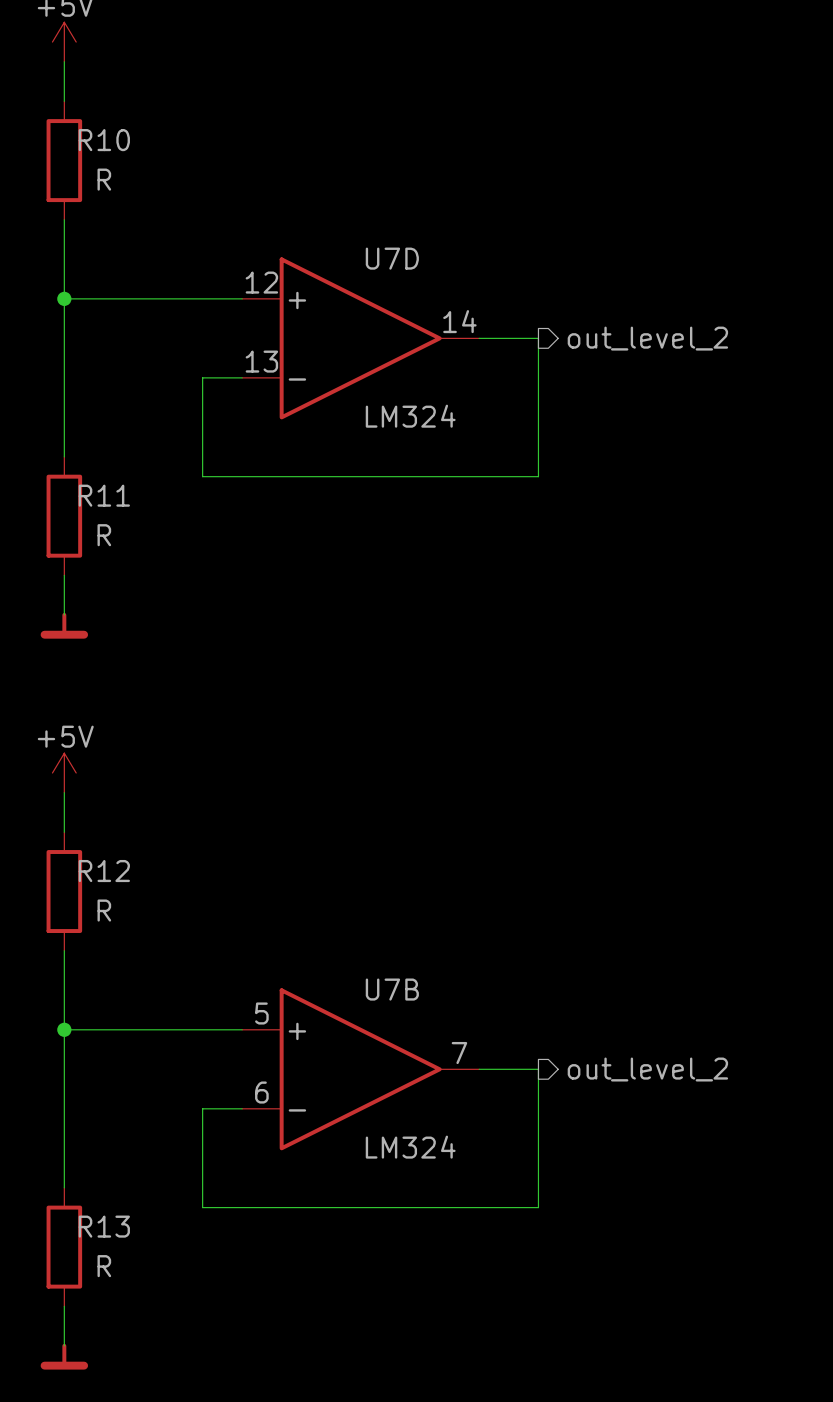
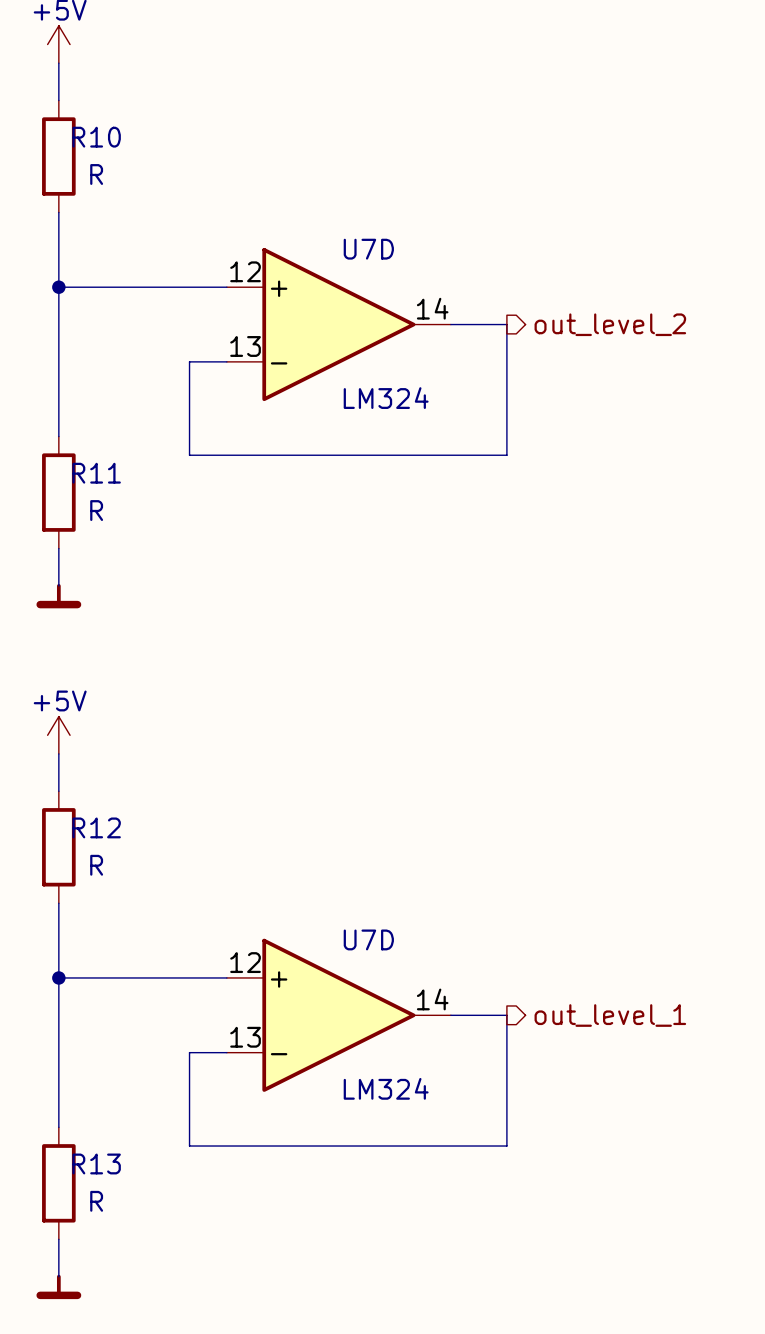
U7B name: U7B (392, 989) -> U7D (368, 939)
U7B pin number: 5 (261, 1013) -> 12 (245, 962)
U7B pin number: 7 (459, 1053) -> 14 (432, 999)
hierarchical label: out_level_2 (647, 1069) -> out_level_1 (610, 1015)
U7B pin number: 6 (261, 1092) -> 13 (245, 1037)

